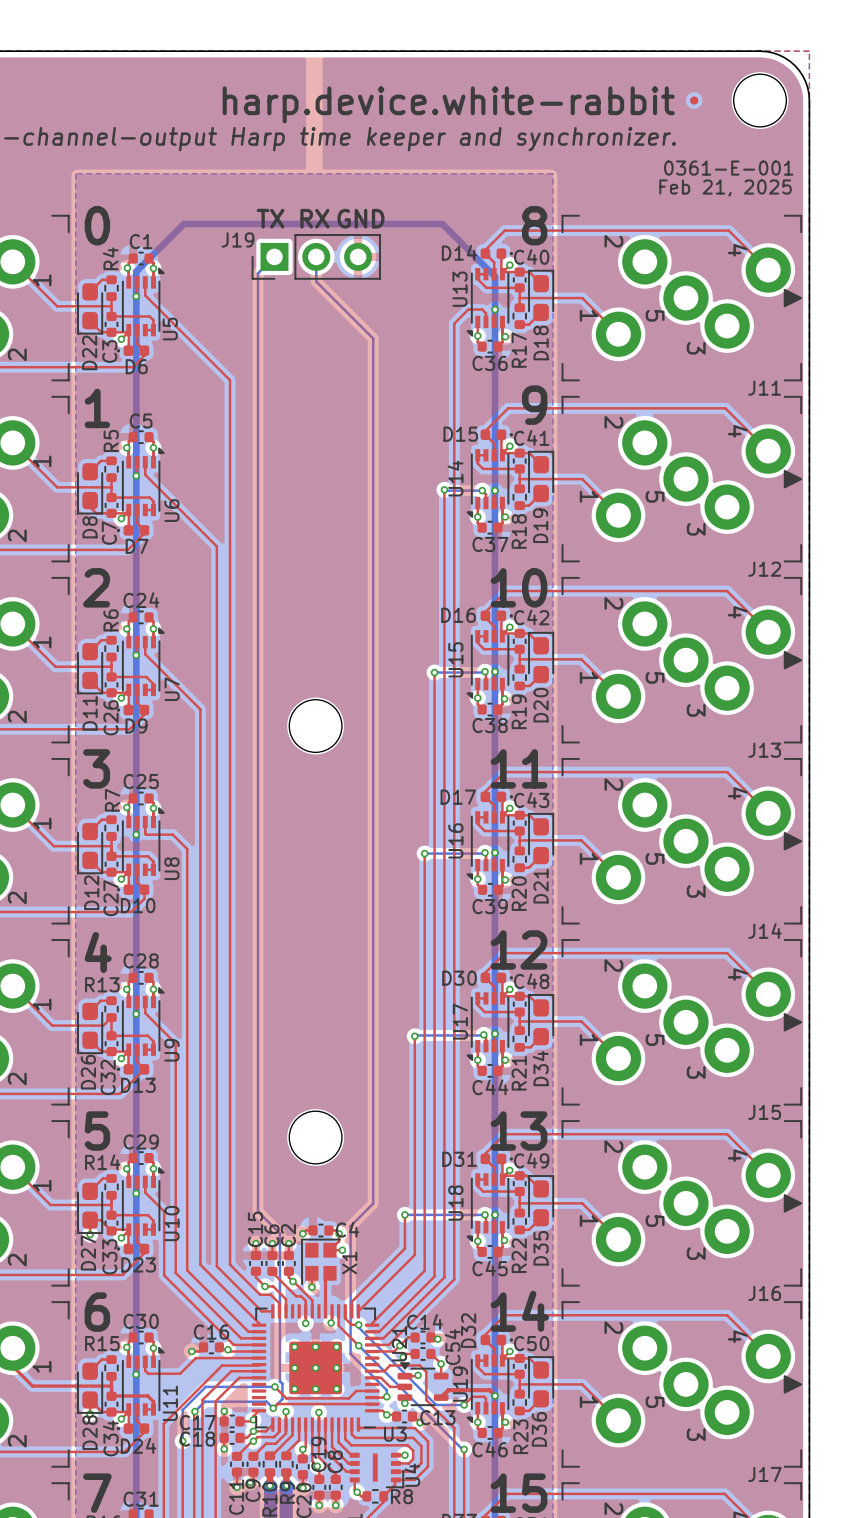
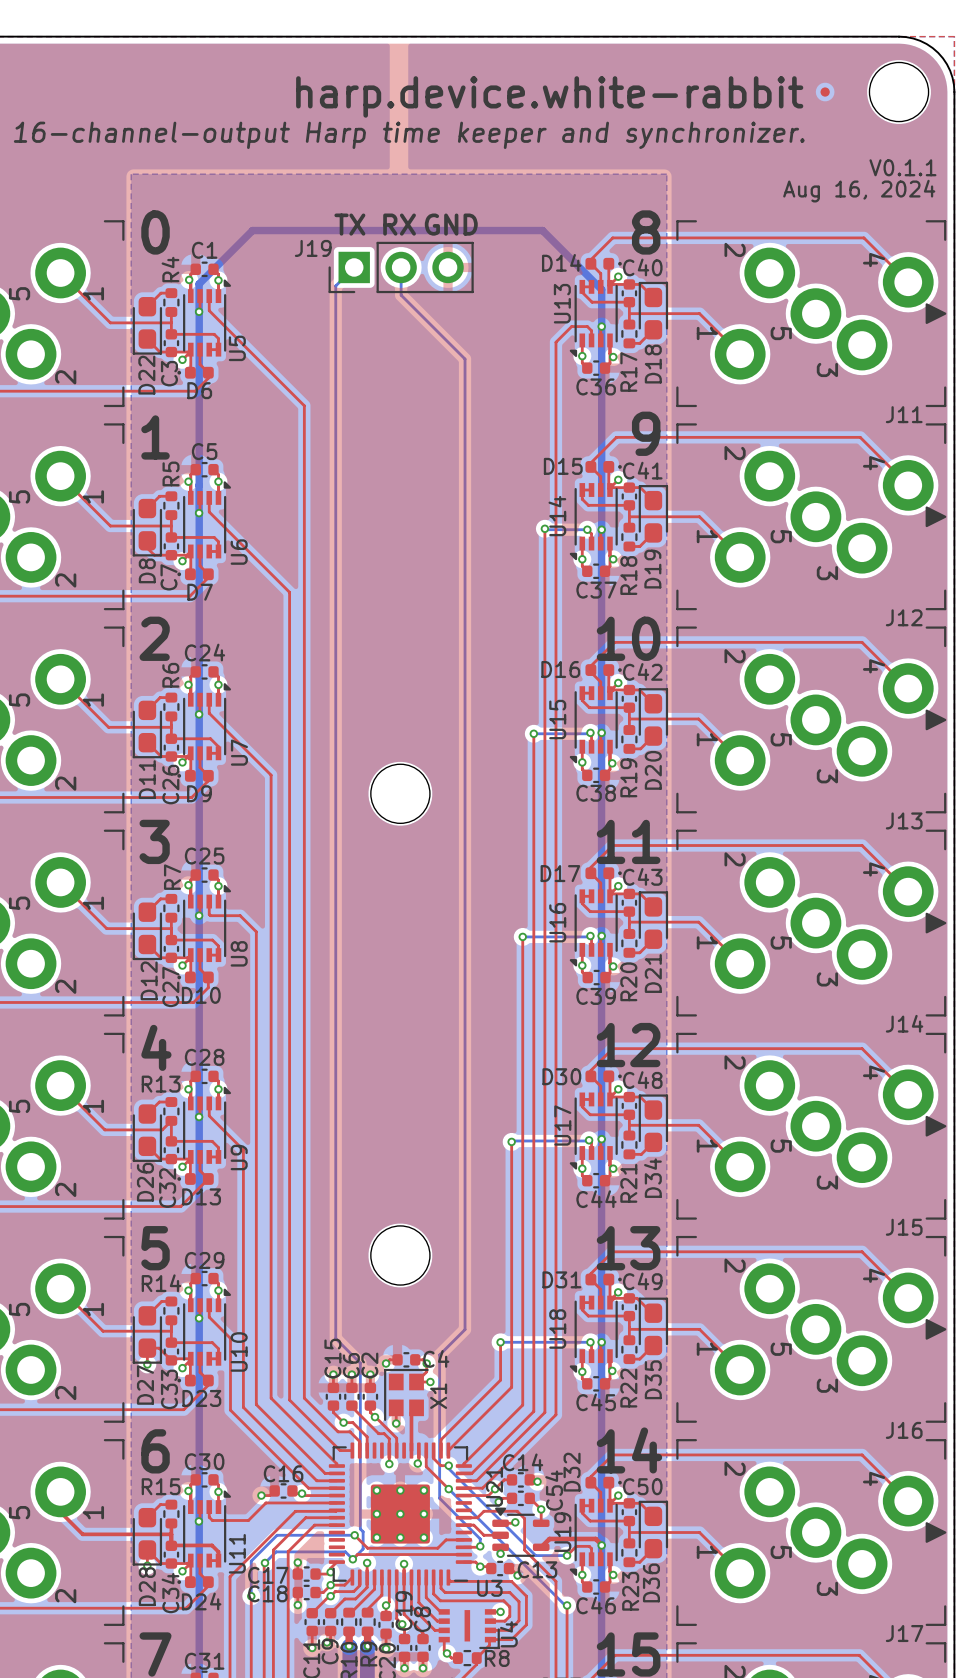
text: 0361-E-001 (728, 168) -> V0.1.1 (902, 167)
text: Feb 21, 2025 (725, 187) -> Aug 16, 2024 (859, 191)

